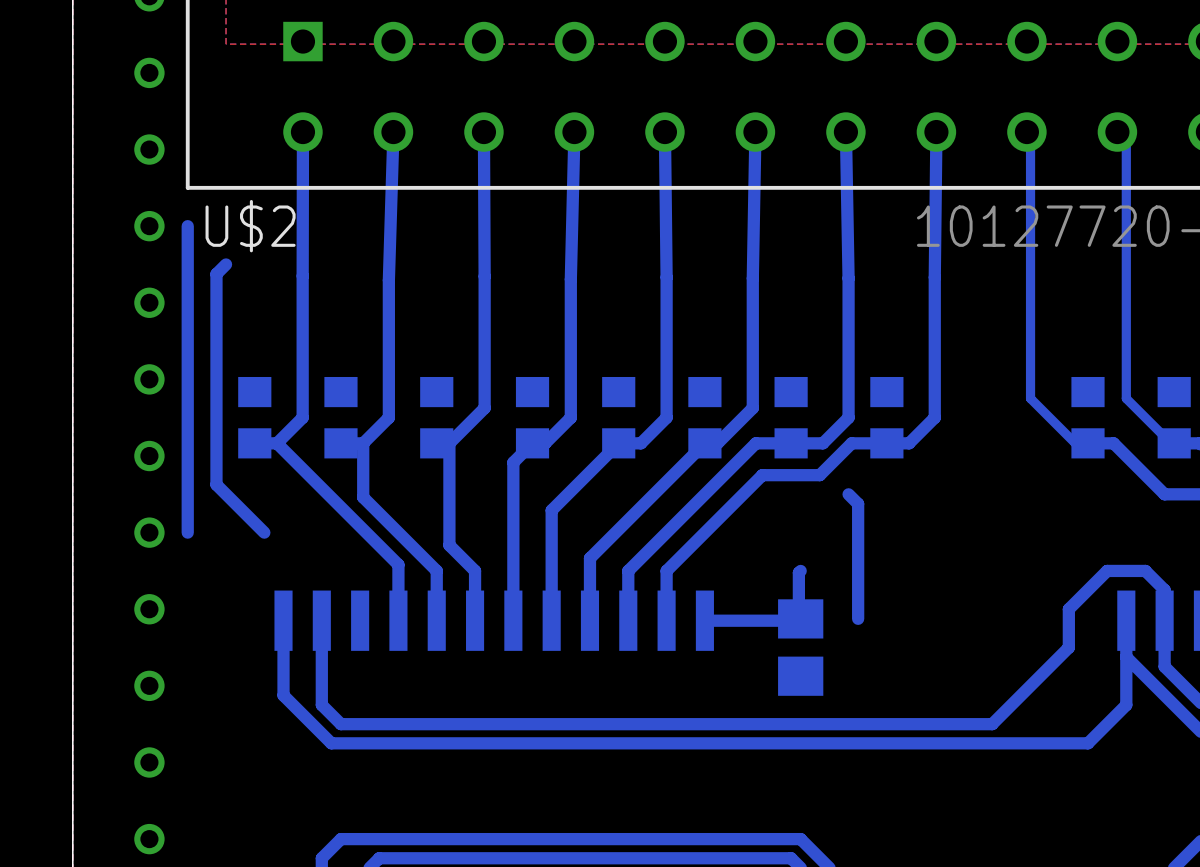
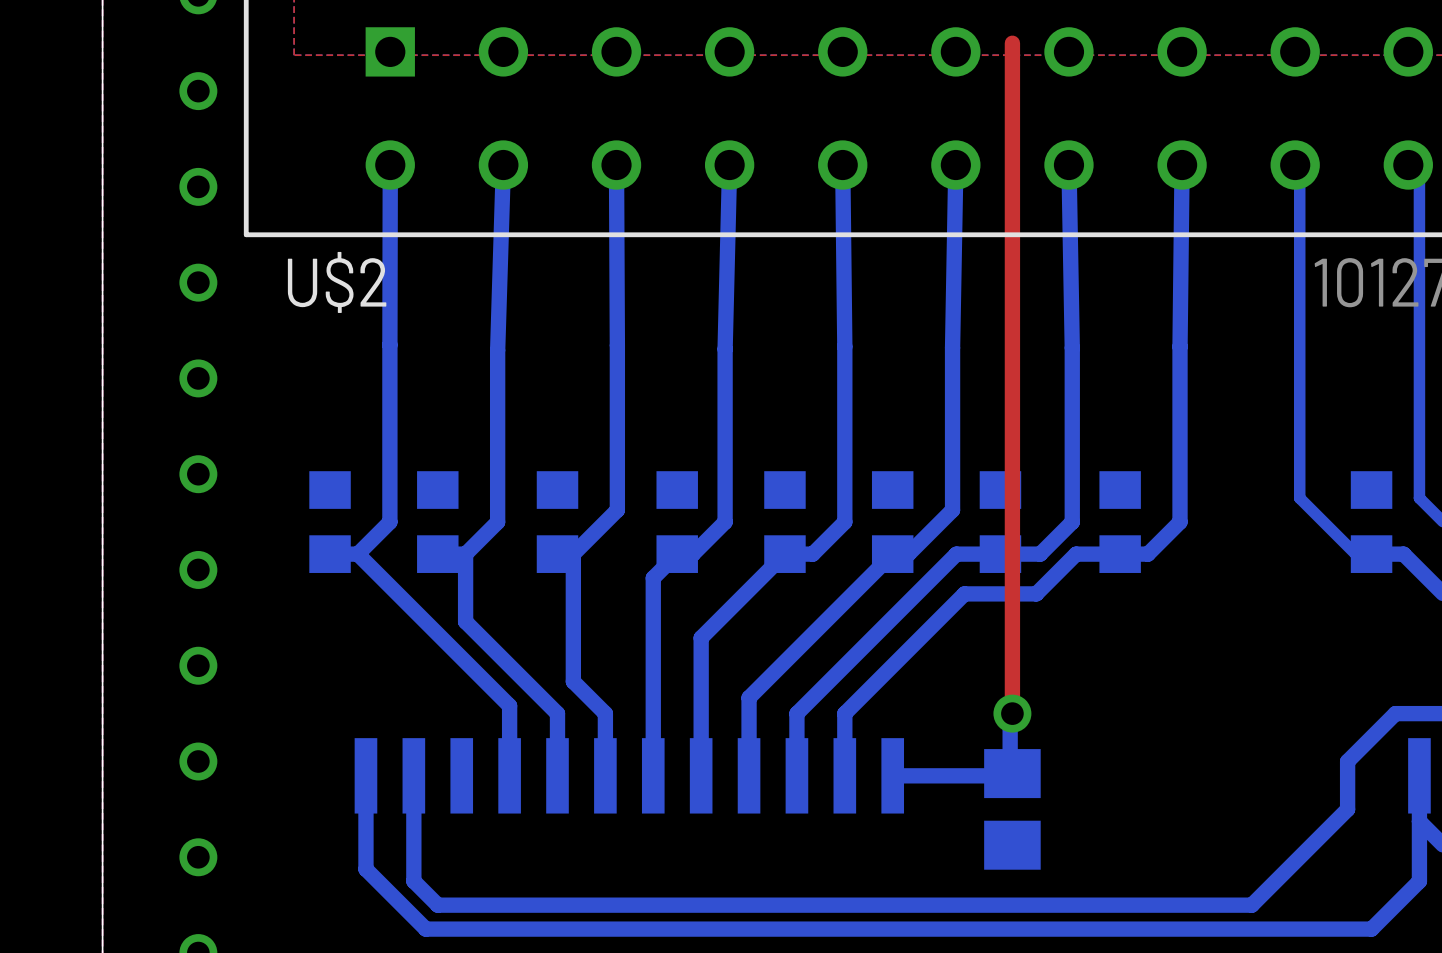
top track: none -> (1012, 43) (1012, 713)
bottom track: (187, 226) (187, 532) -> none
bottom track: (226, 264) (216, 274) (216, 484) (264, 532) -> none
bottom track: (848, 494) (858, 503) (858, 618) -> none
via: none -> (1012, 713)

